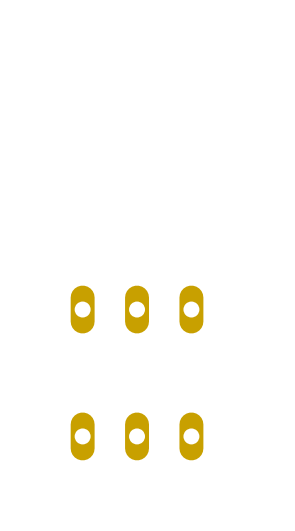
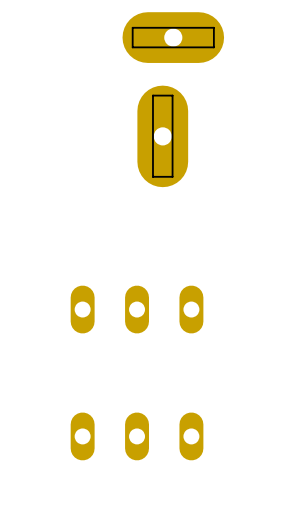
part: none -> (173, 99)

